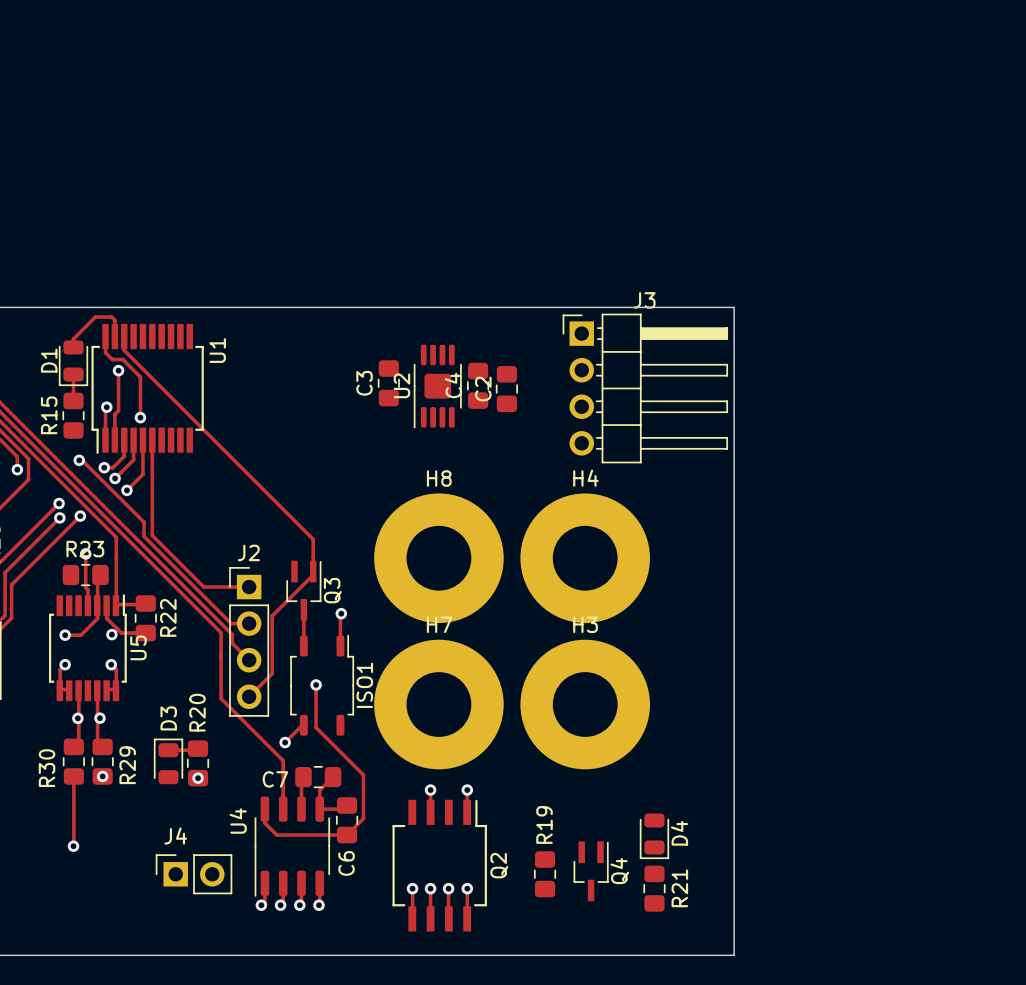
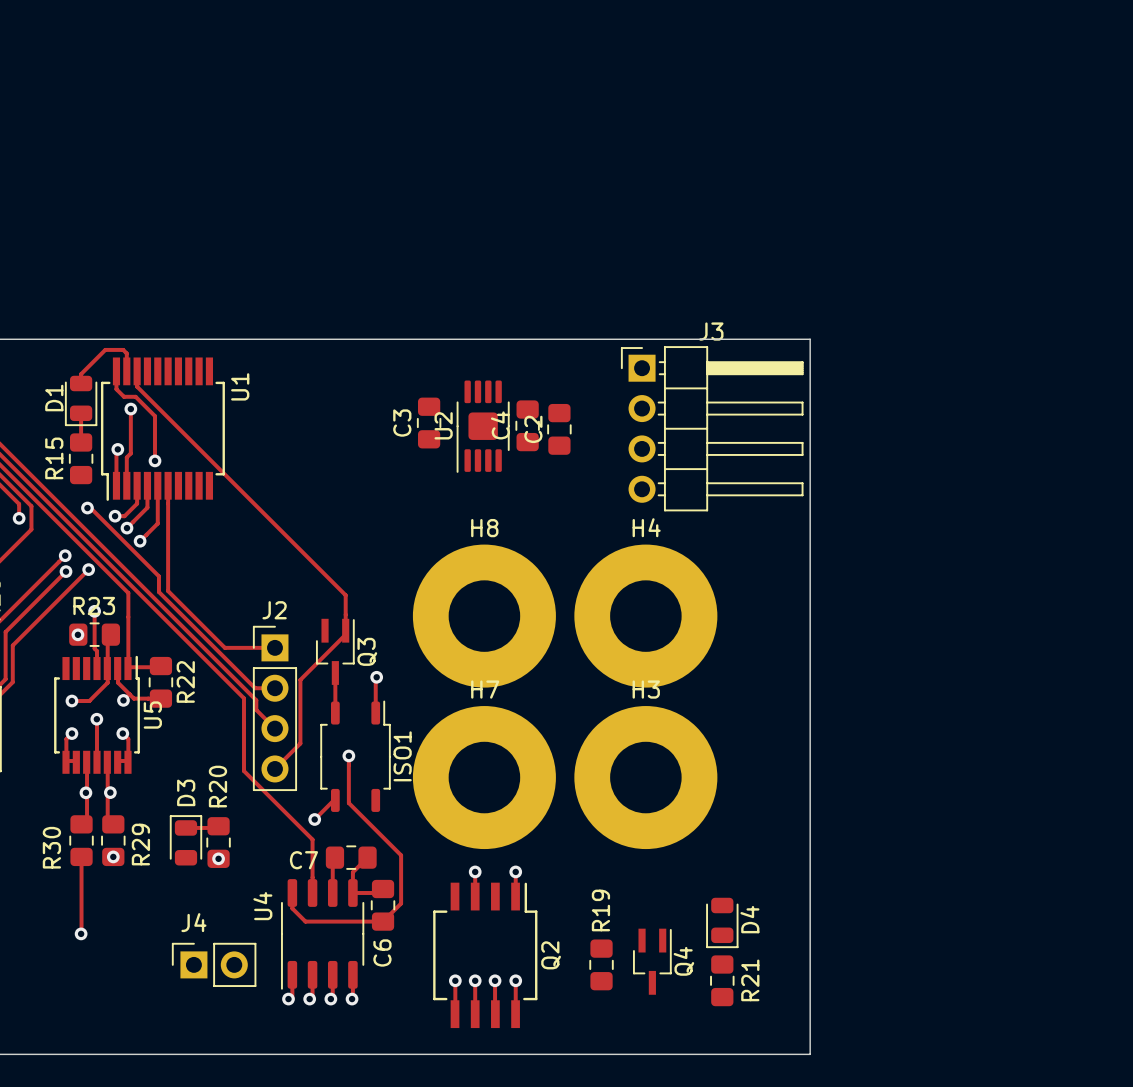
via: none -> (77, 634)
track: none -> (97, 719) (97, 762)
via: none -> (96, 719)

